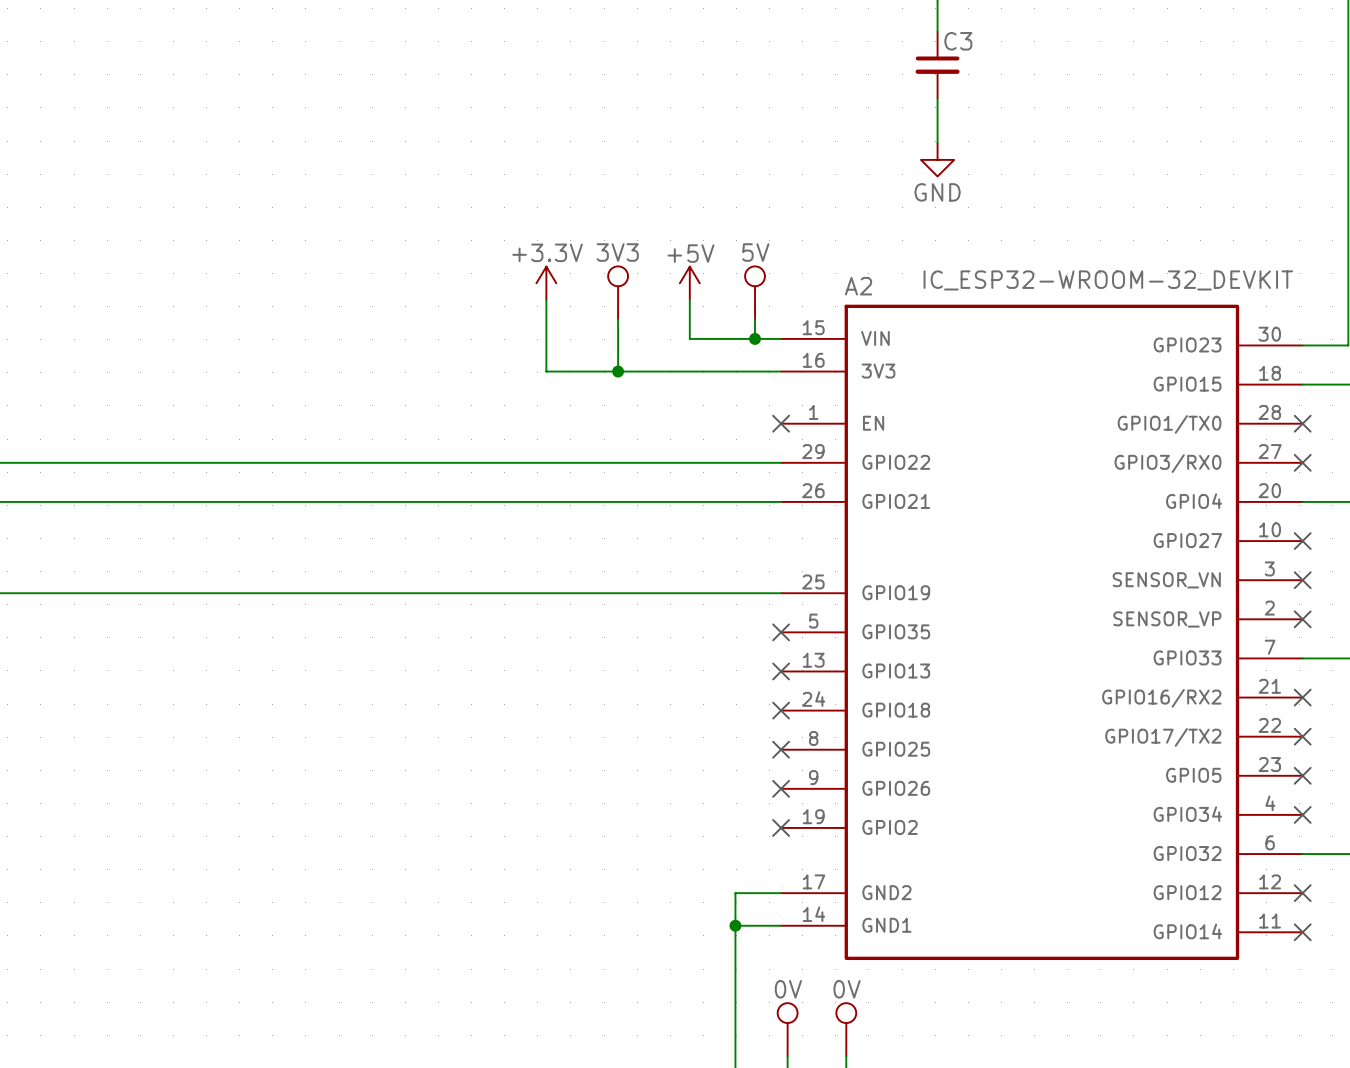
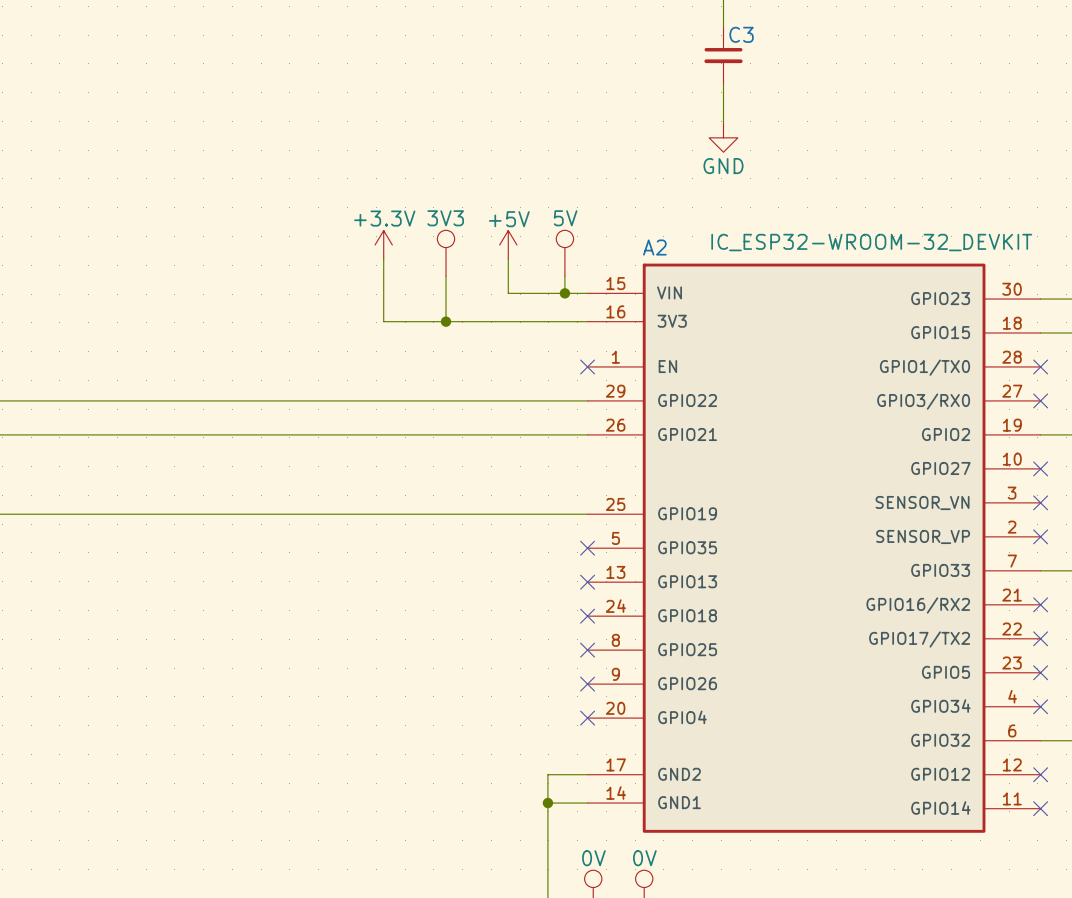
A2 pin number: 20 (1269, 490) -> 19 (1012, 425)
A2 pin name: GPIO4 (1194, 501) -> GPIO2 (946, 434)
A2 pin number: 19 (813, 816) -> 20 (615, 708)
A2 pin name: GPIO2 (890, 827) -> GPIO4 (682, 717)

